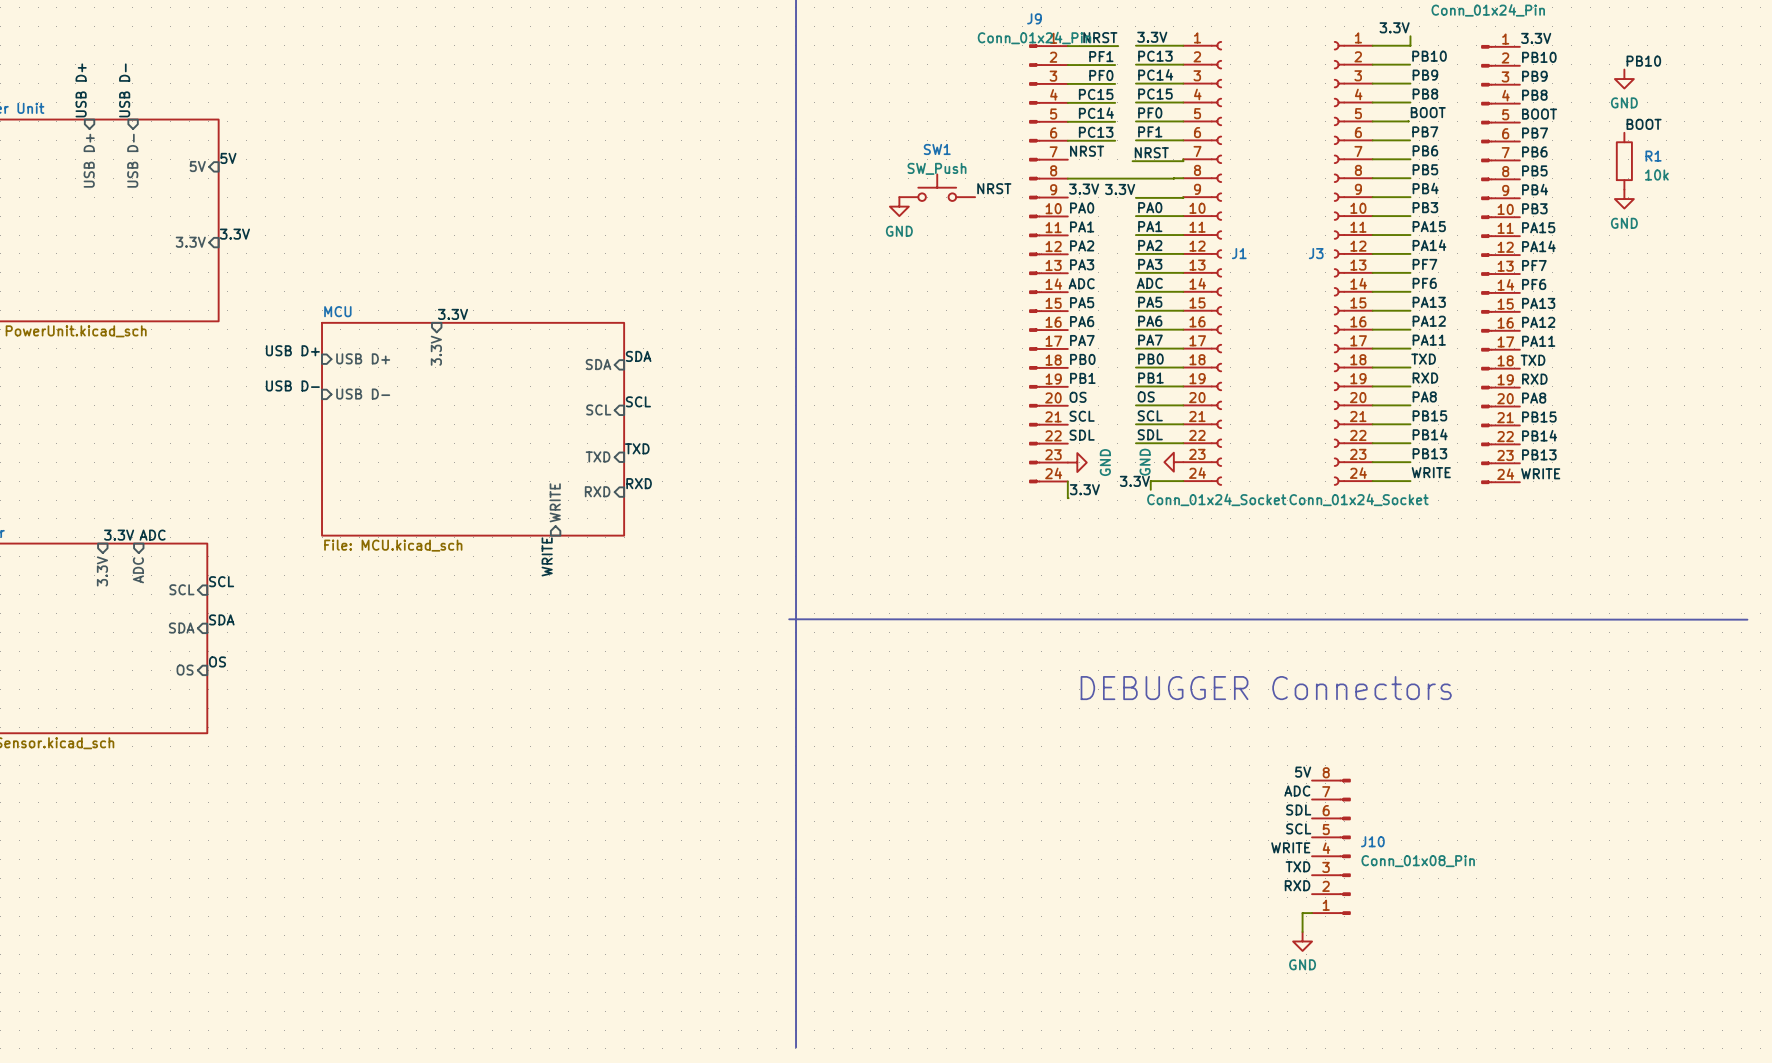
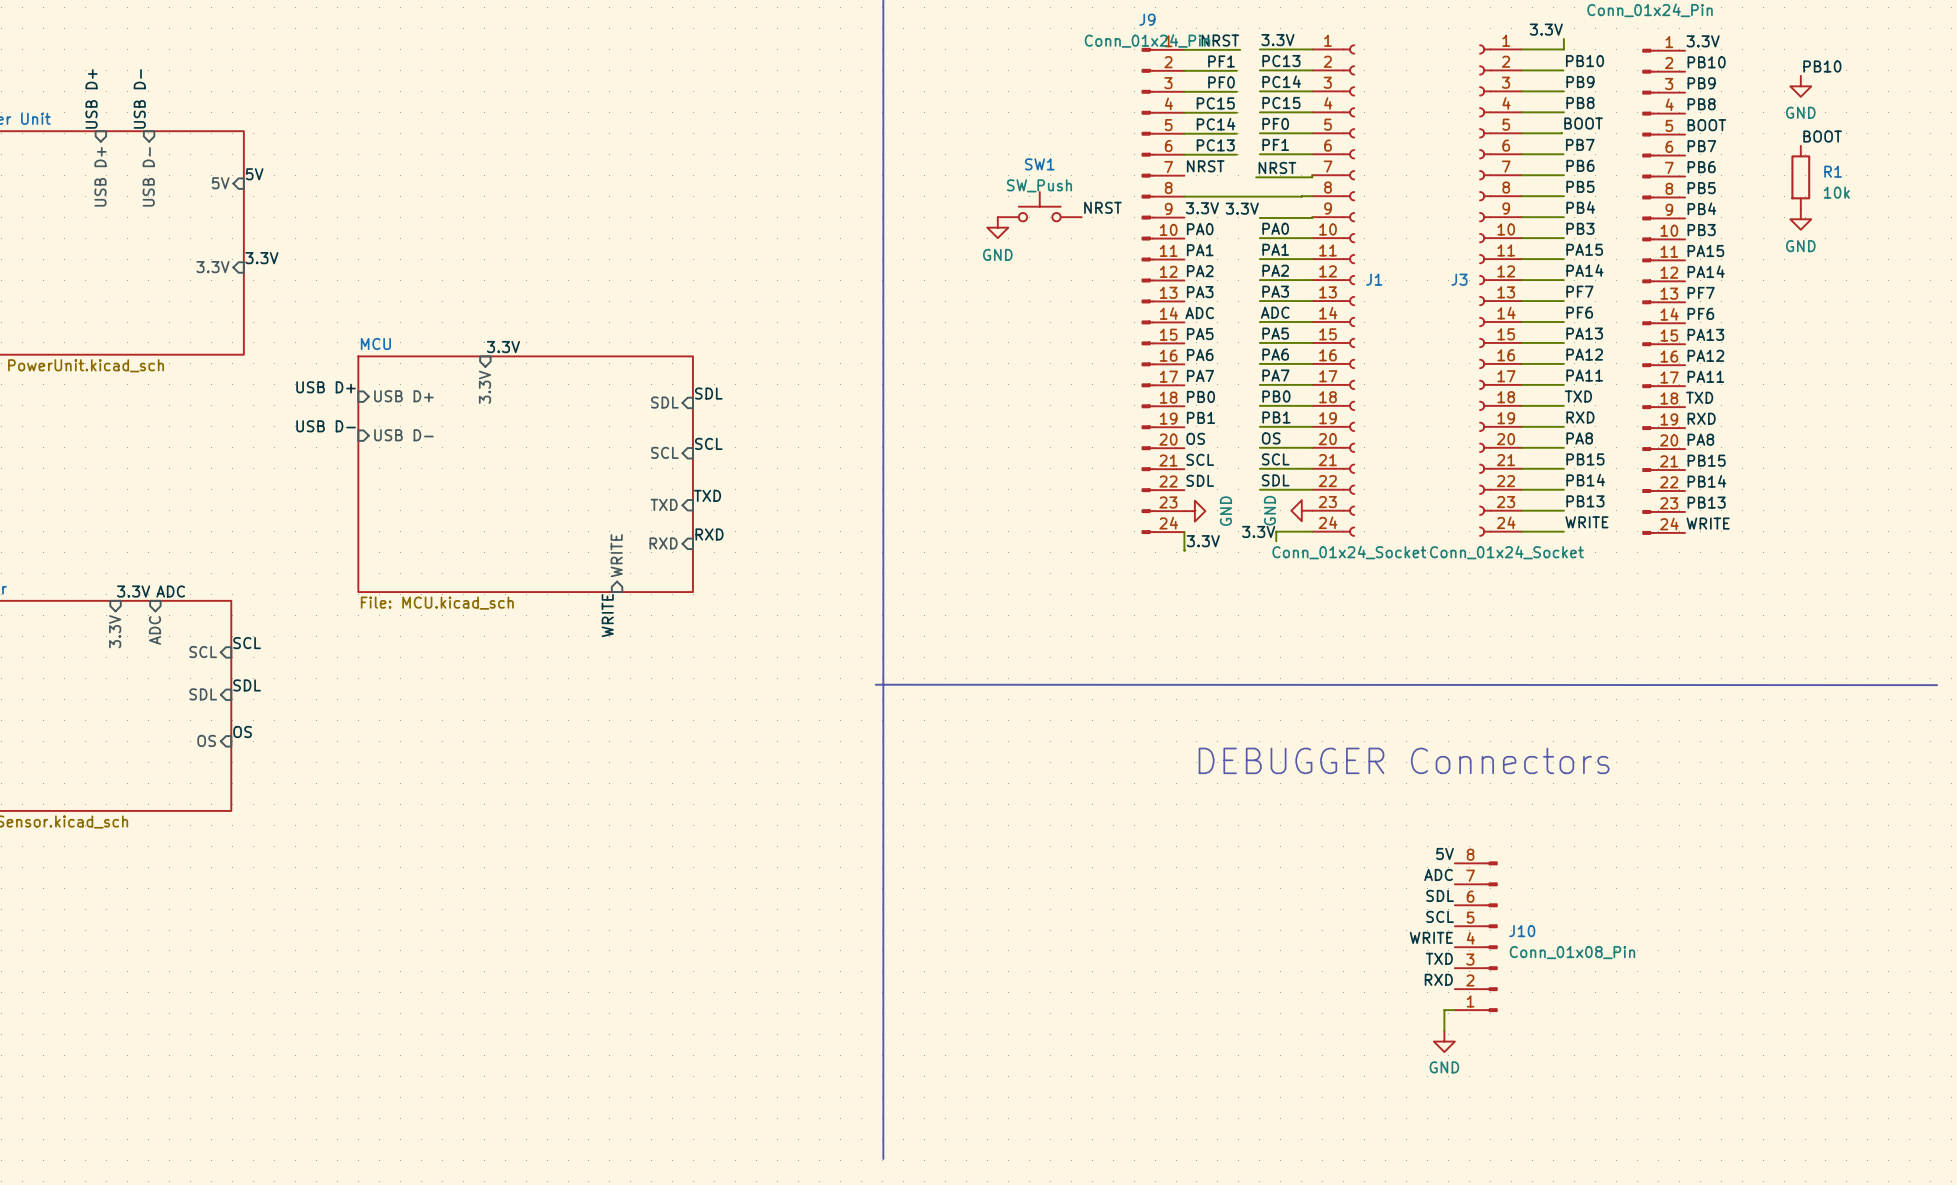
label: SDA (638, 356) -> SDL (708, 393)
sheet pin: SDA (598, 364) -> SDL (664, 402)
label: SDA (221, 619) -> SDL (247, 685)
sheet pin: SDA (181, 628) -> SDL (203, 694)

